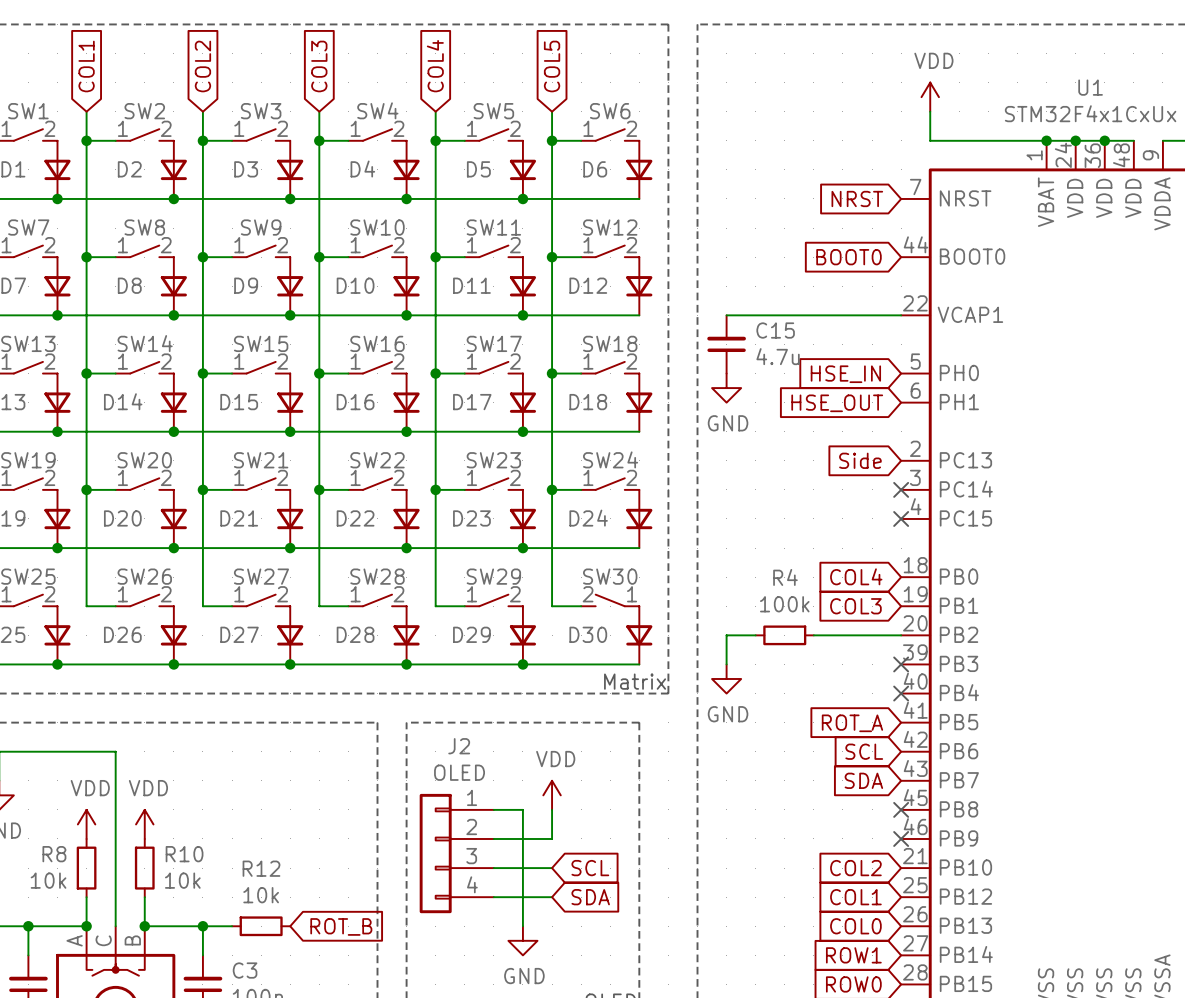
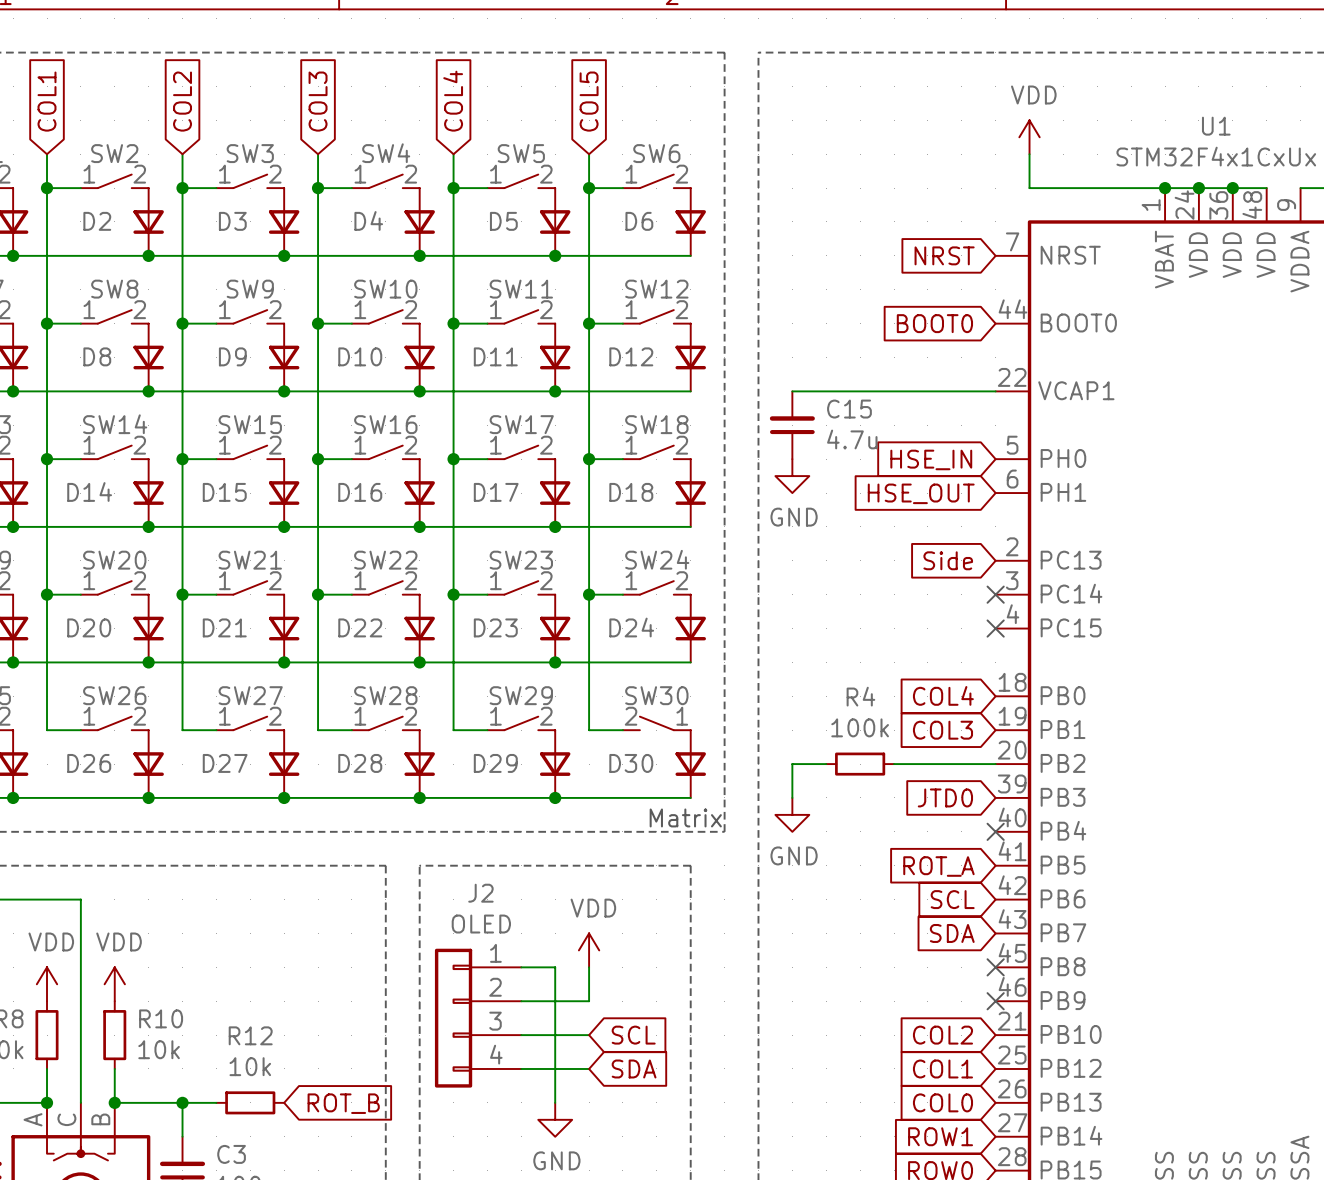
global label: none -> JTD0 (945, 797)
no-connect mark: (901, 664) -> none

